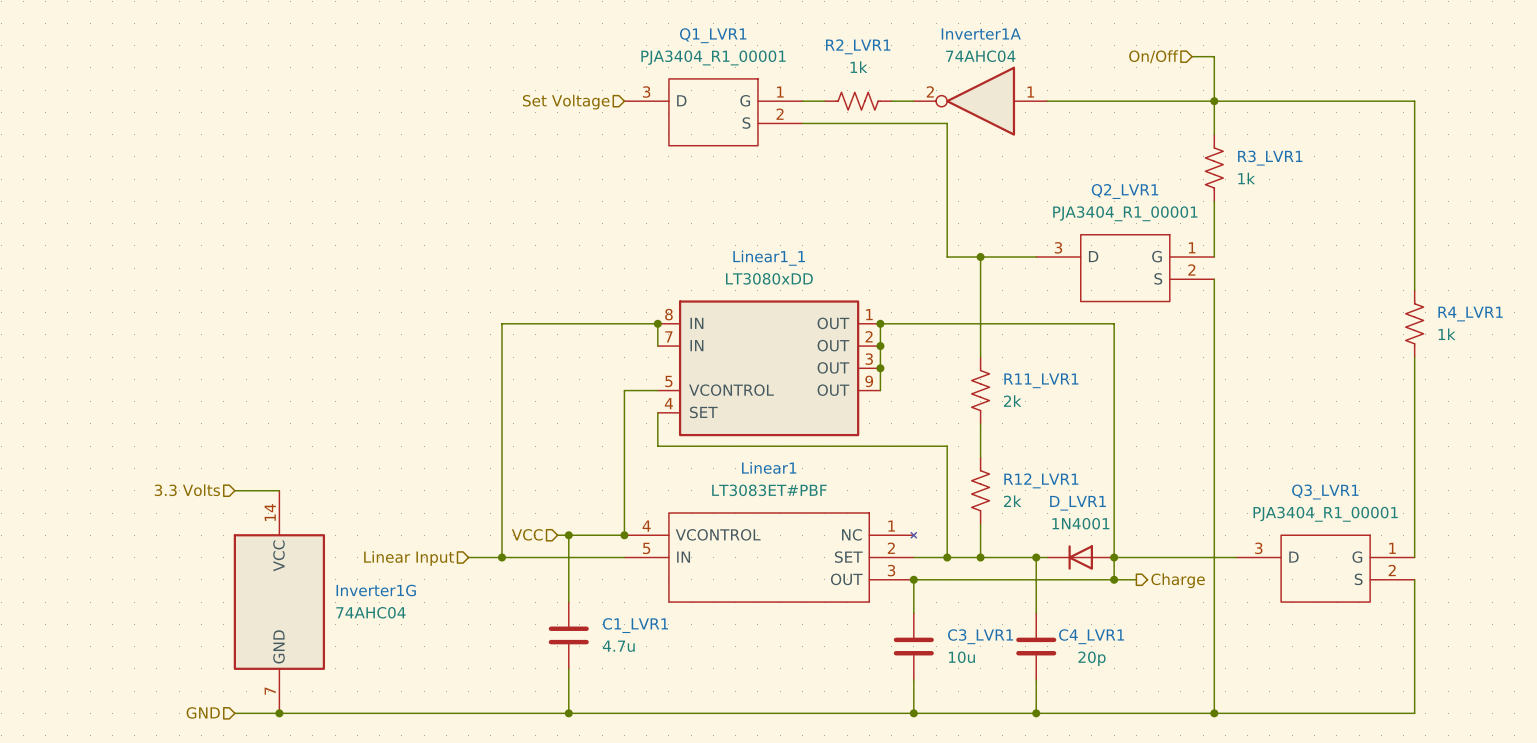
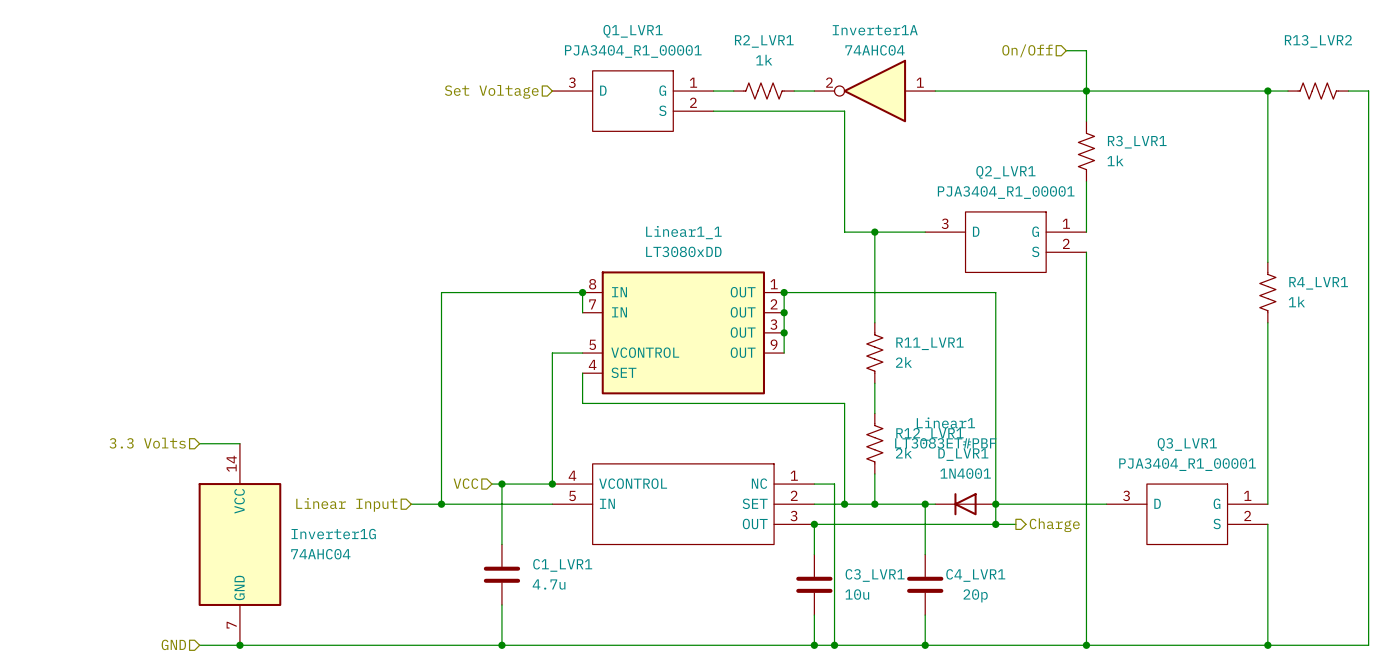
wire: none -> (1267, 91) (1288, 91)
junction: none -> (1267, 91)
R13_LVR2: none -> (1318, 91)
wire: none -> (1348, 91) (1368, 91) (1368, 645) (1267, 645)
Linear1 name position: Linear1 (769, 467) -> Linear1 (945, 422)
Linear1 value position: LT3083ET#PBF (769, 490) -> LT3083ET#PBF (945, 443)
Linear1 symbol: [624, 512, 917, 603] -> [552, 463, 815, 546]
wire: none -> (814, 484) (834, 484) (834, 645)
junction: none -> (834, 645)
junction: none -> (1267, 645)

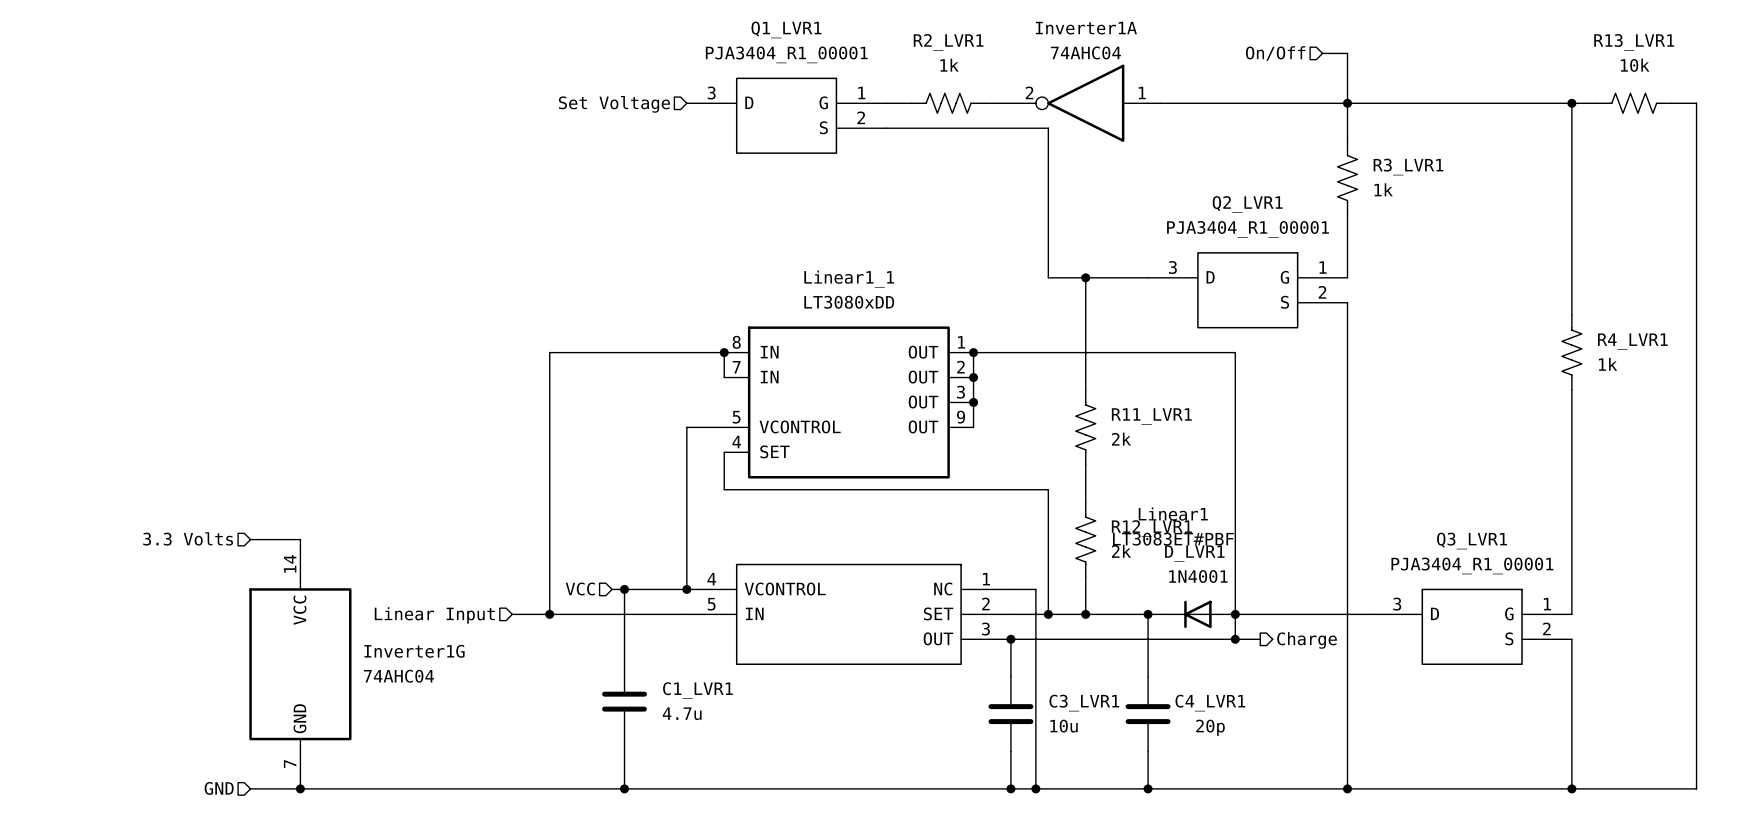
R13_LVR2 name: R13_LVR2 (1318, 41) -> R13_LVR1 (1634, 42)
R13_LVR2 value: none -> 10k (1635, 65)

